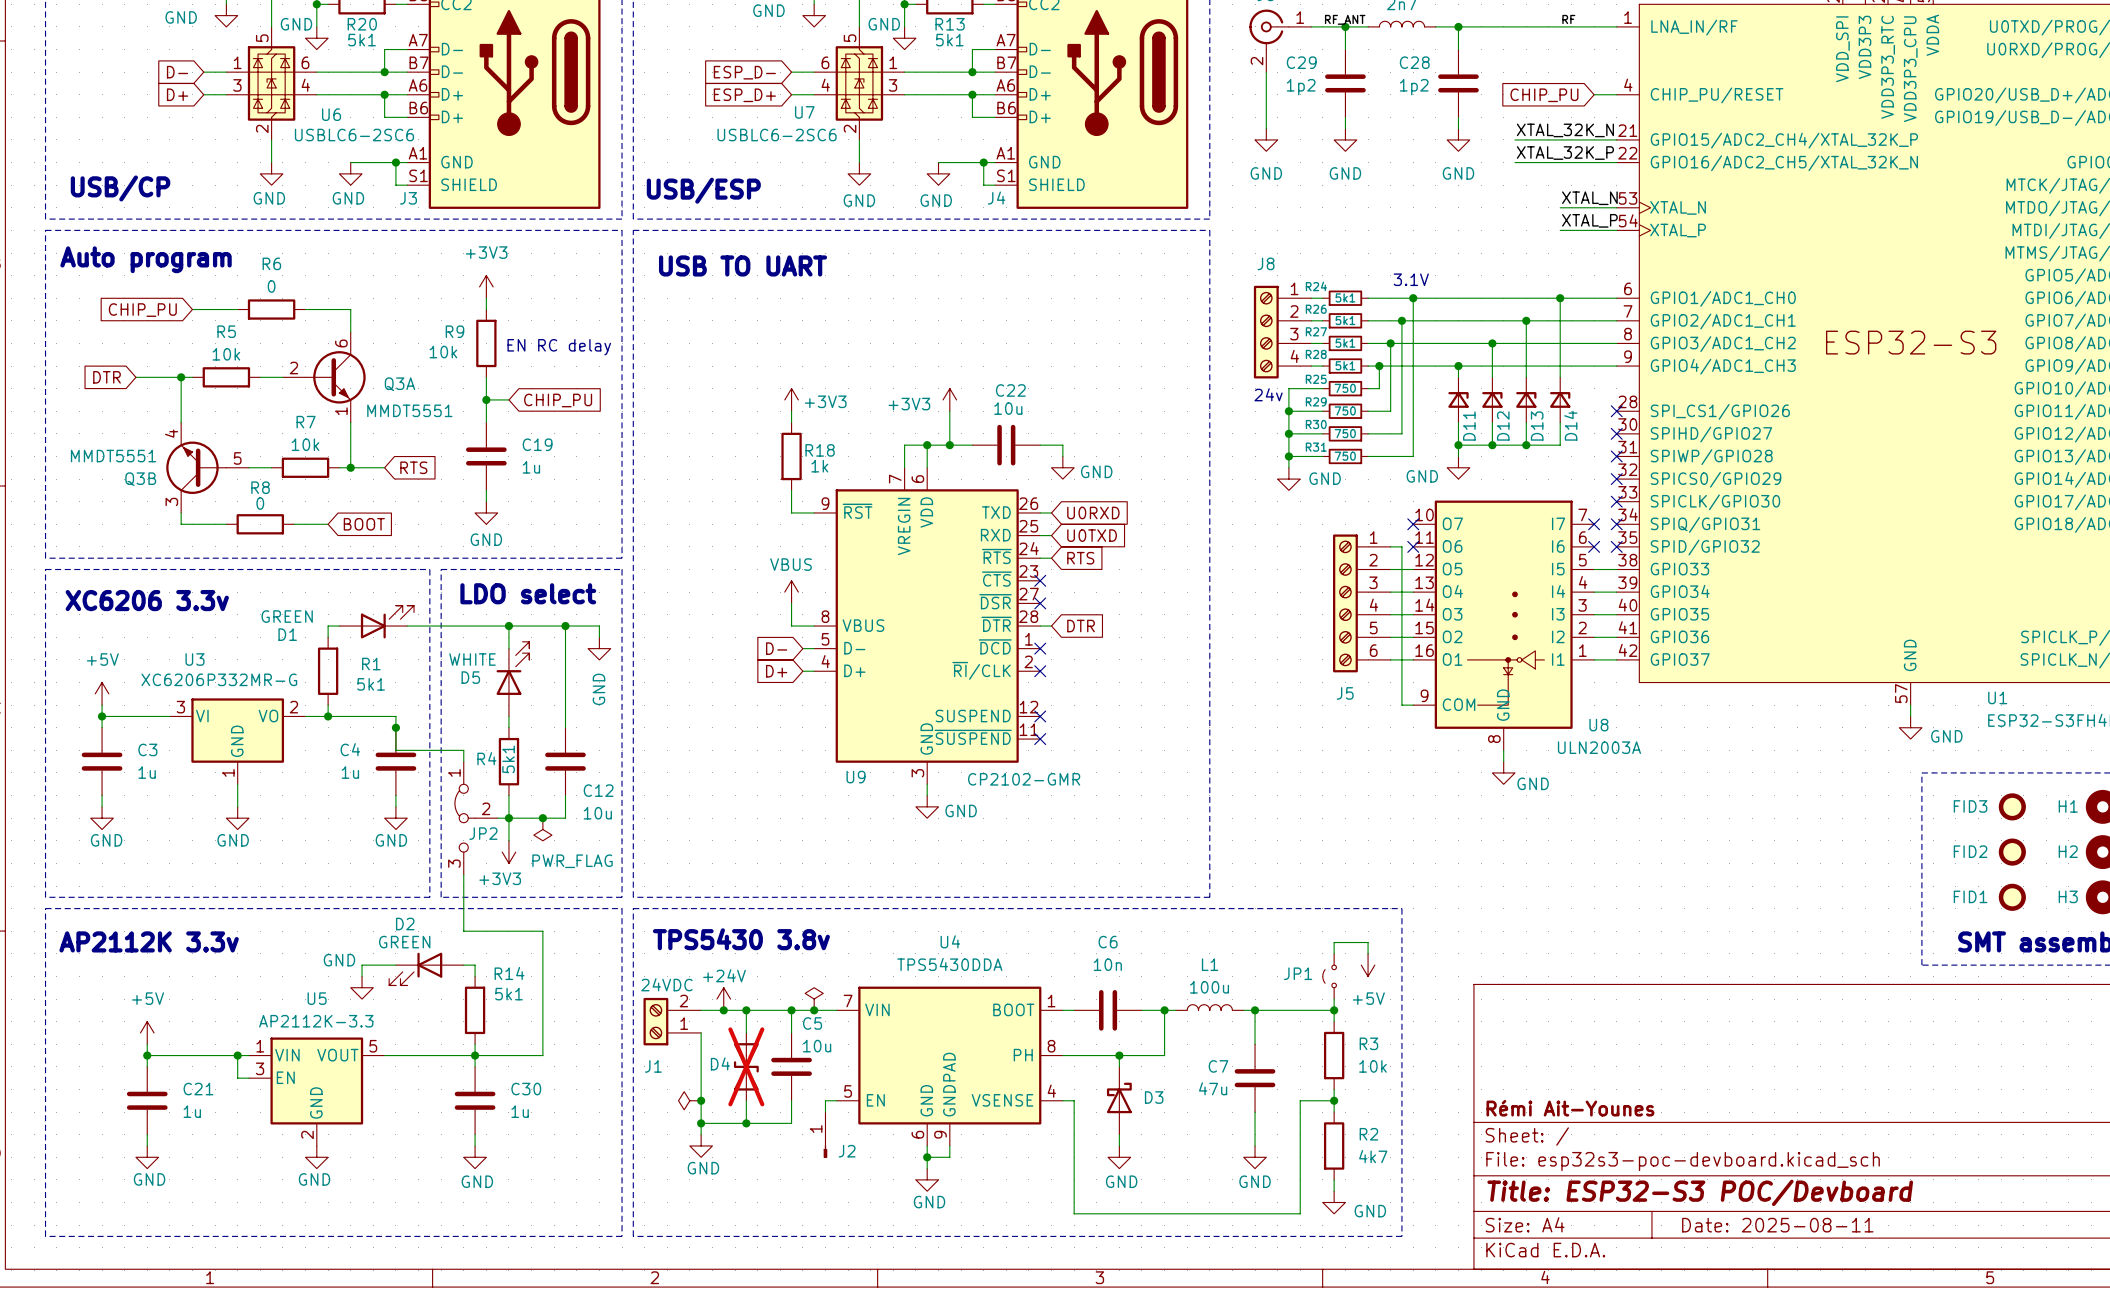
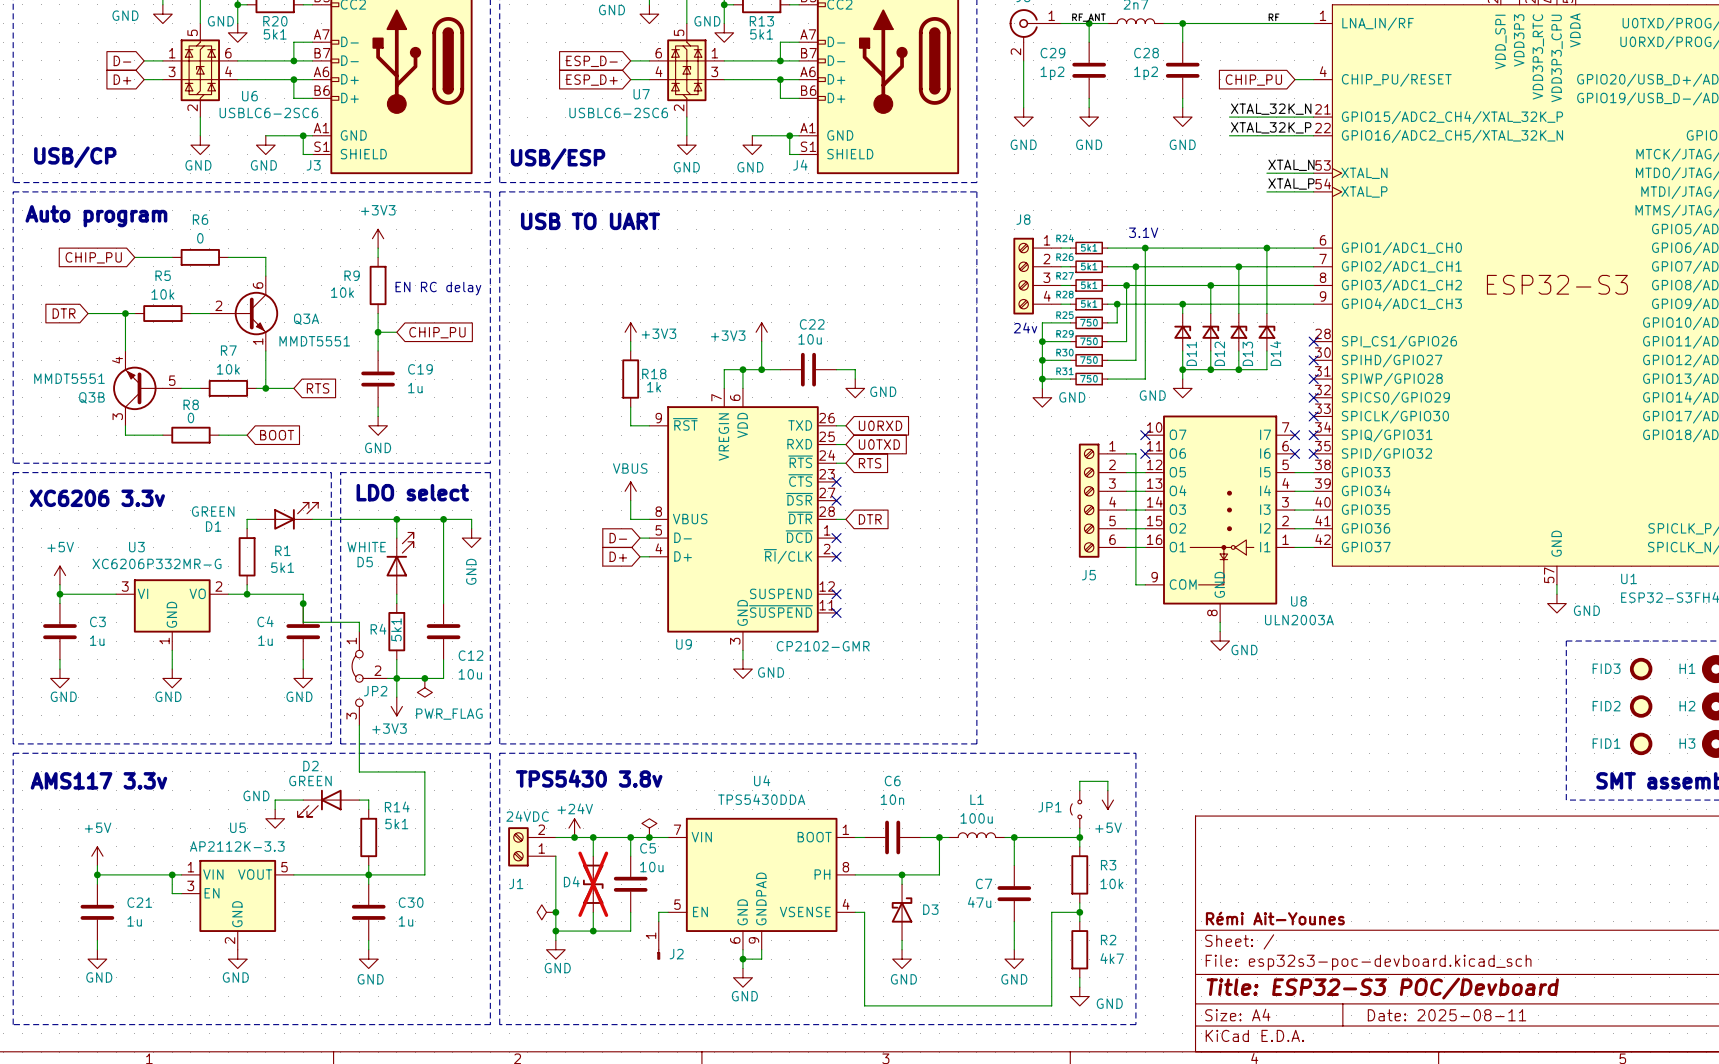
text: AP2112K 3.3v (149, 941) -> AMS117 3.3v (98, 780)

